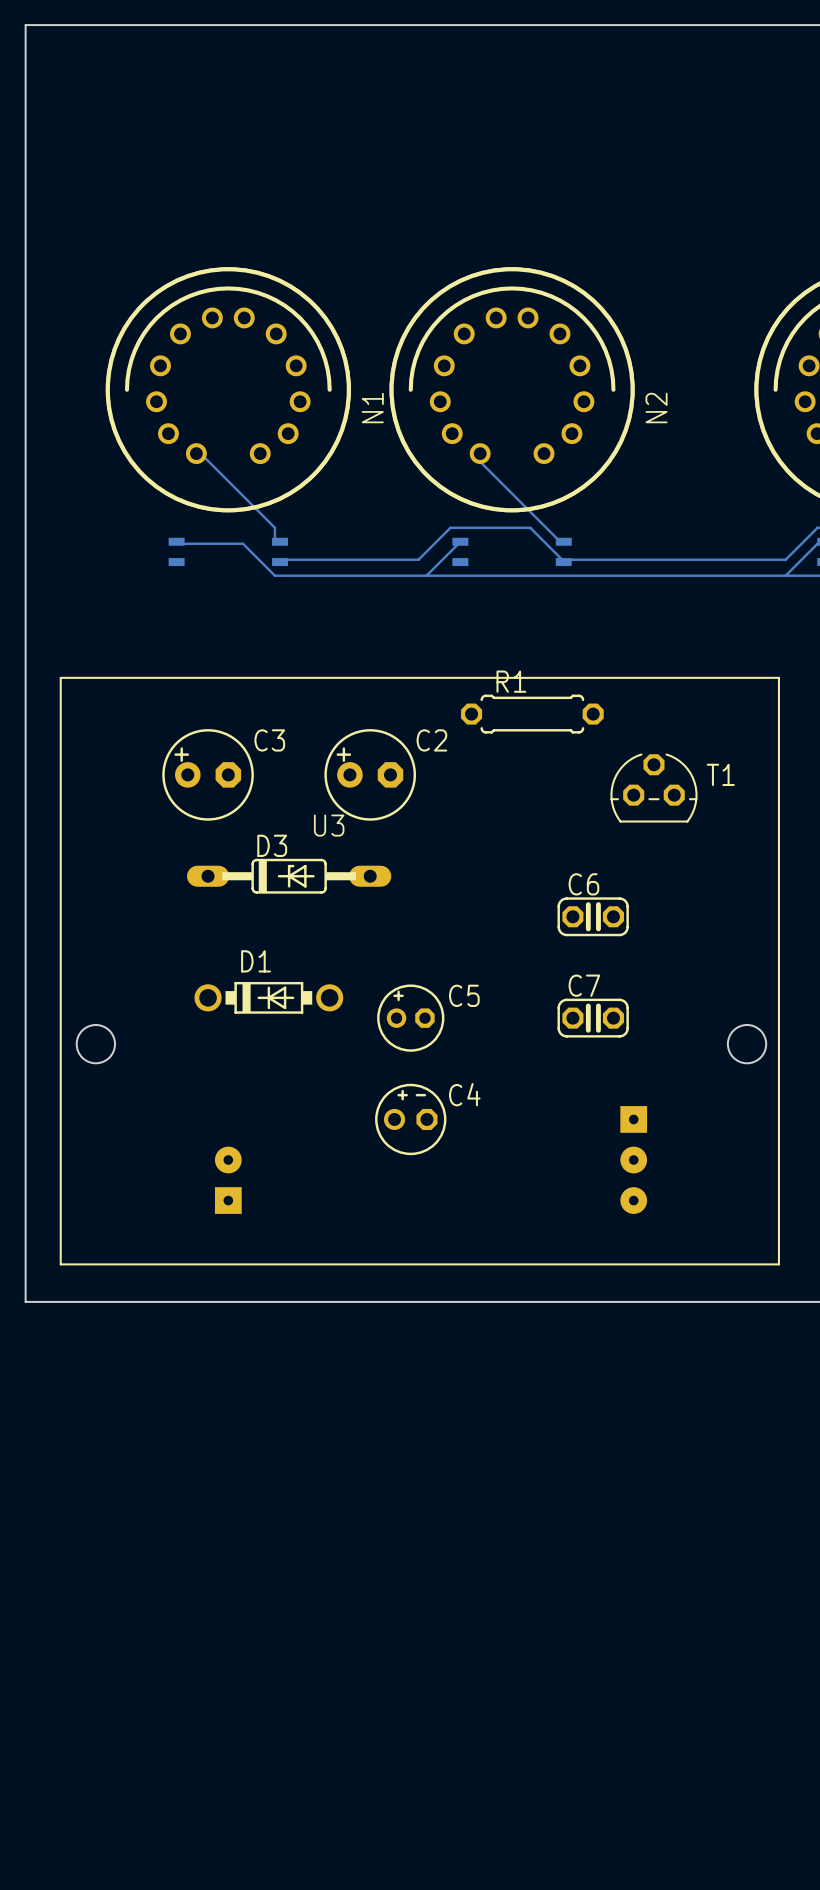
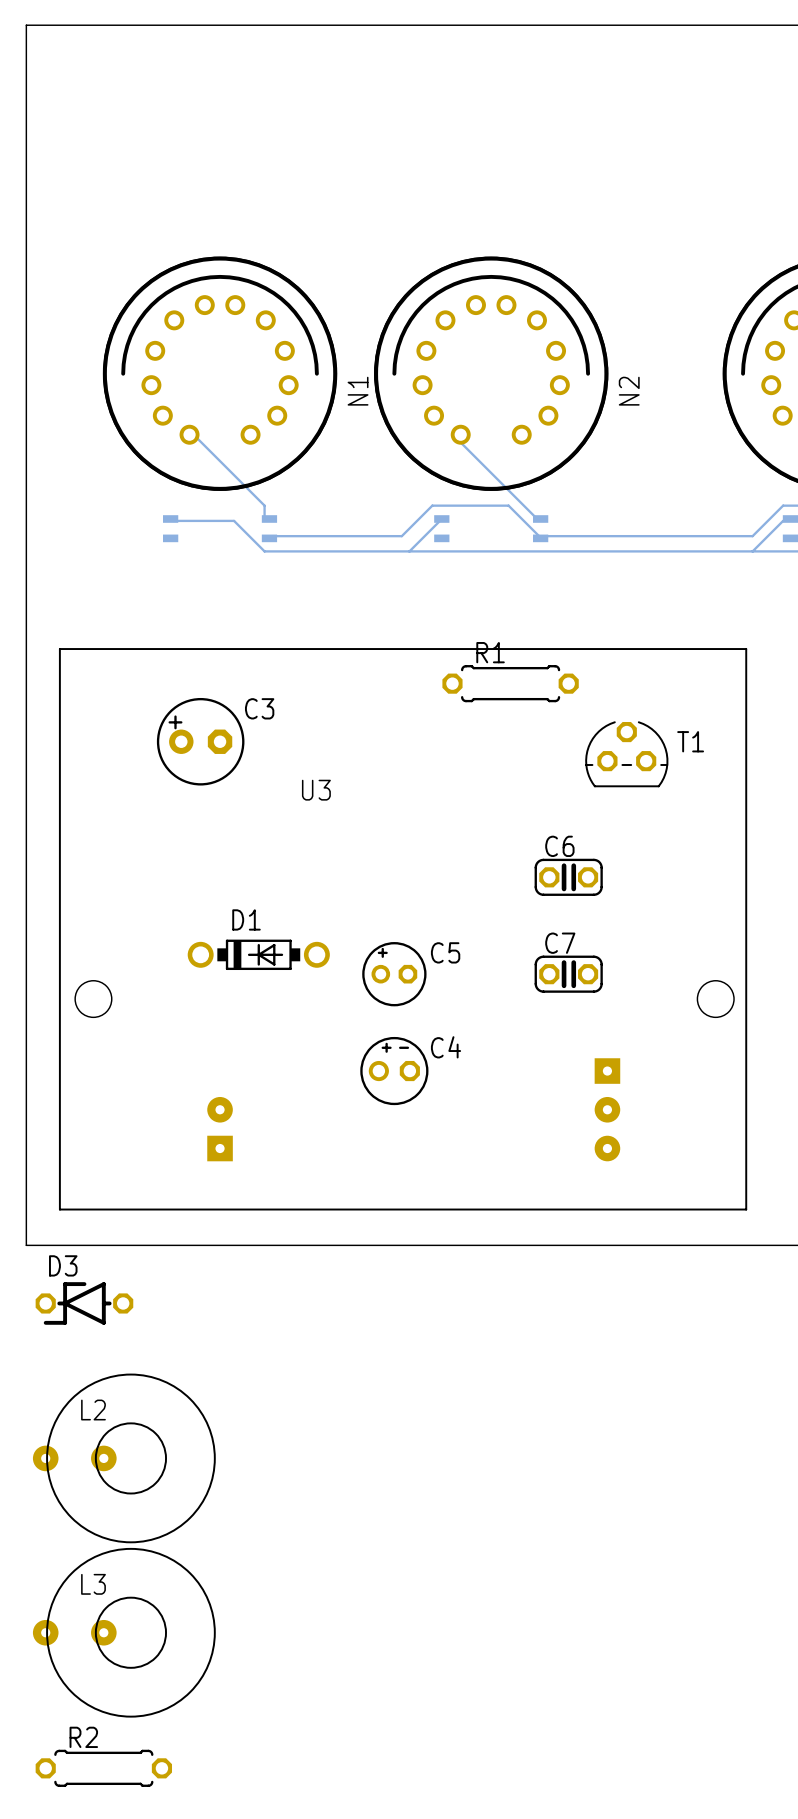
C2: (370, 774) -> none
D3 footprint: [186, 858, 392, 894] -> [35, 1282, 134, 1325]
L2: none -> (124, 1458)
L3: none -> (124, 1632)
R2: none -> (103, 1768)

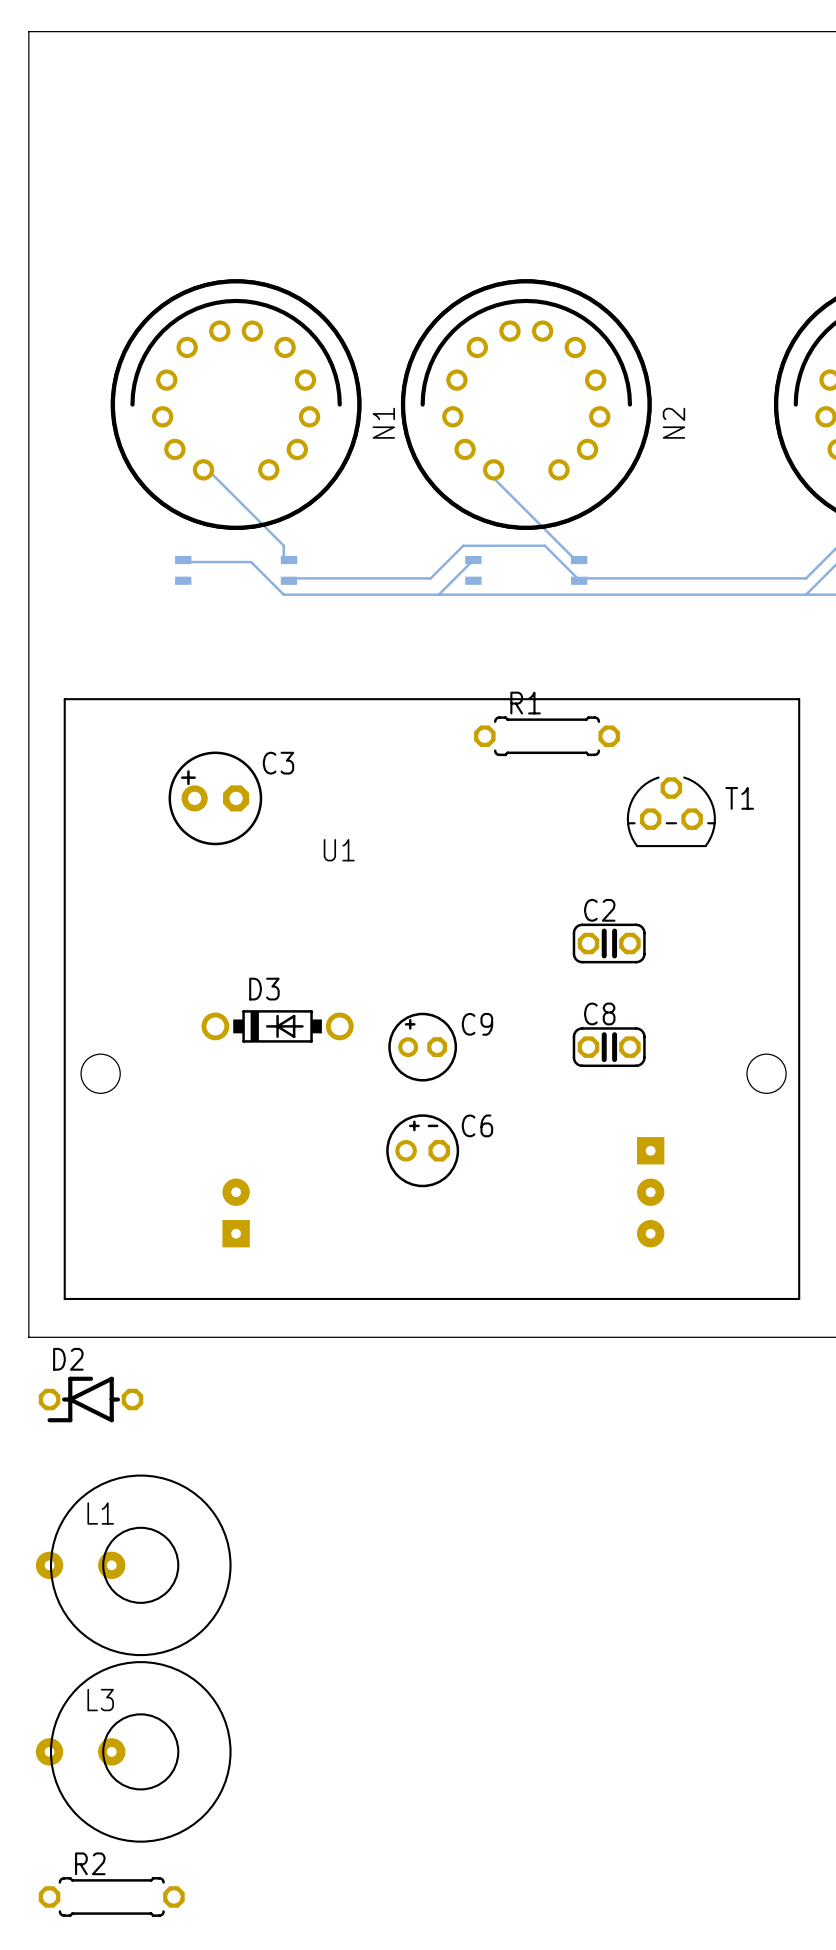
U3 name: U3 (316, 790) -> U1 (339, 850)
C6 name: C6 (559, 846) -> C2 (599, 910)
D1 name: D1 (246, 919) -> D3 (264, 989)
C7 name: C7 (560, 943) -> C8 (599, 1013)
C5 name: C5 (445, 952) -> C9 (477, 1024)
C4 name: C4 (446, 1047) -> C6 (477, 1125)
D3 name: D3 (63, 1265) -> D2 (68, 1359)
L2 name: L2 (93, 1410) -> L1 (100, 1513)

